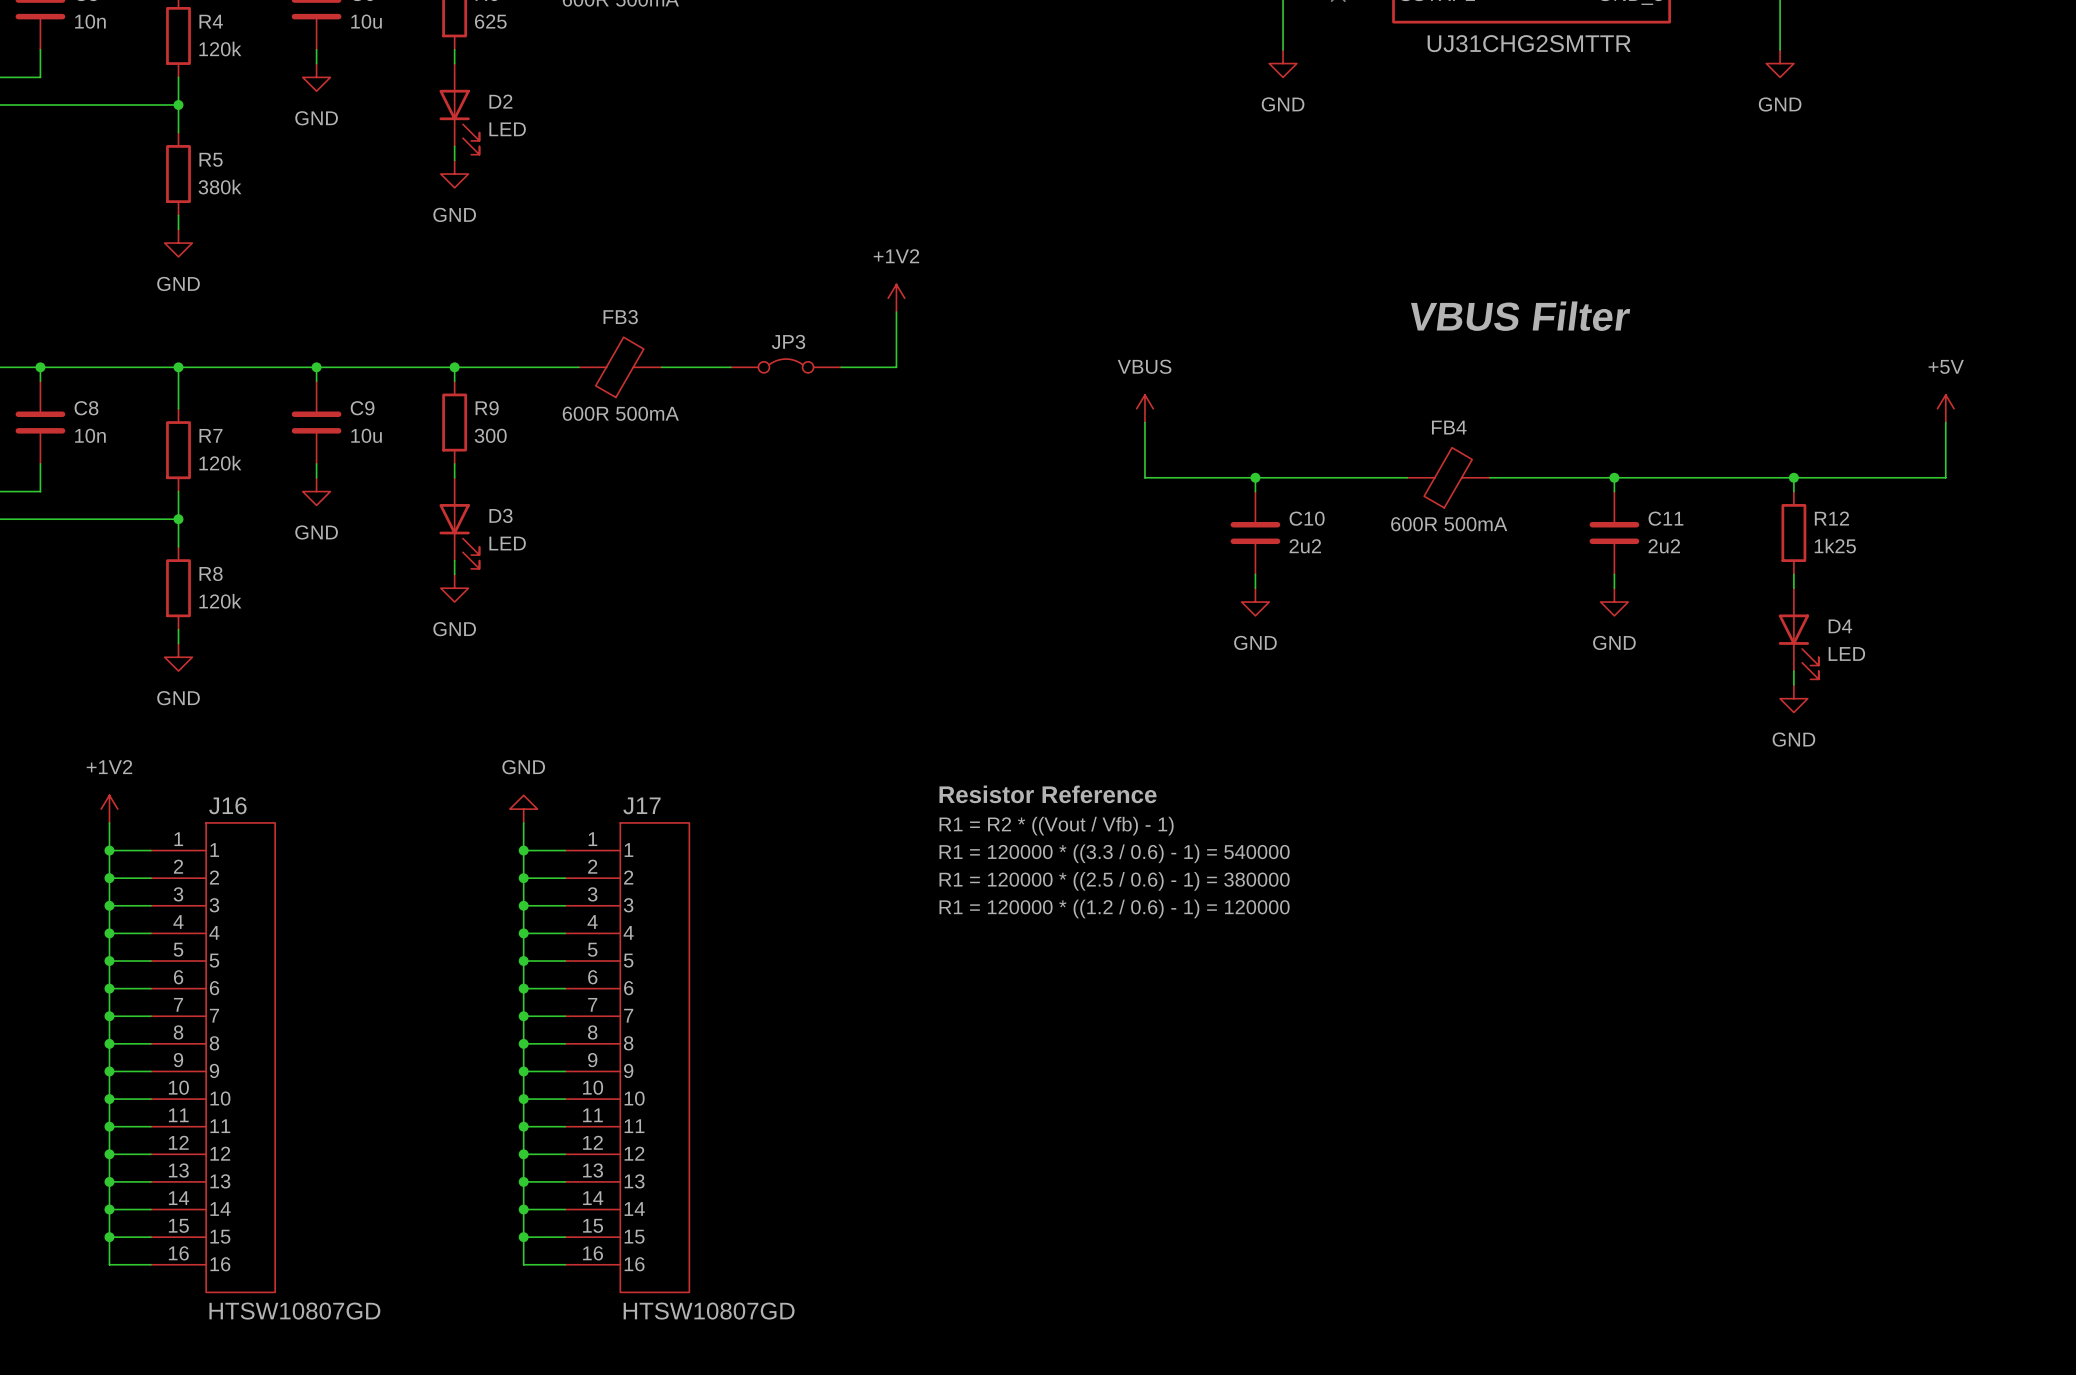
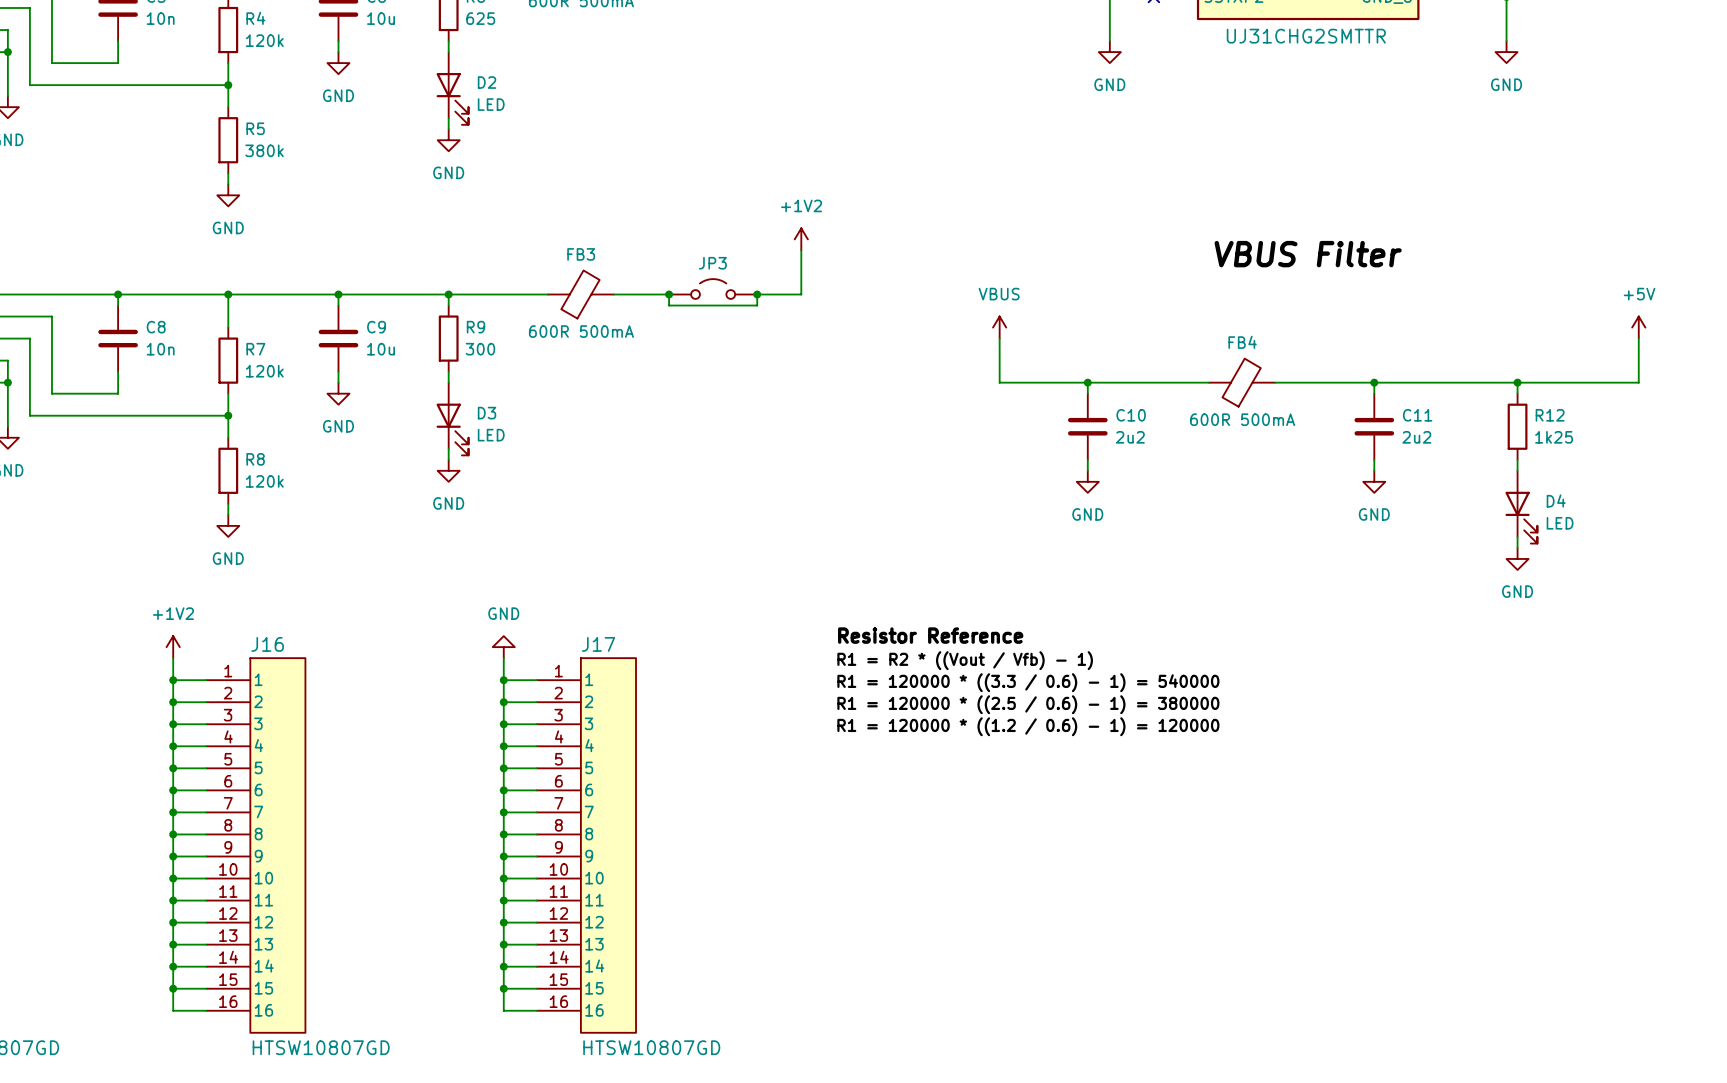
JP3 symbol: [730, 359, 842, 373] -> [669, 279, 758, 299]
wire: none -> (669, 294) (669, 305) (757, 305) (757, 294)
junction: none -> (669, 294)
junction: none -> (757, 294)

